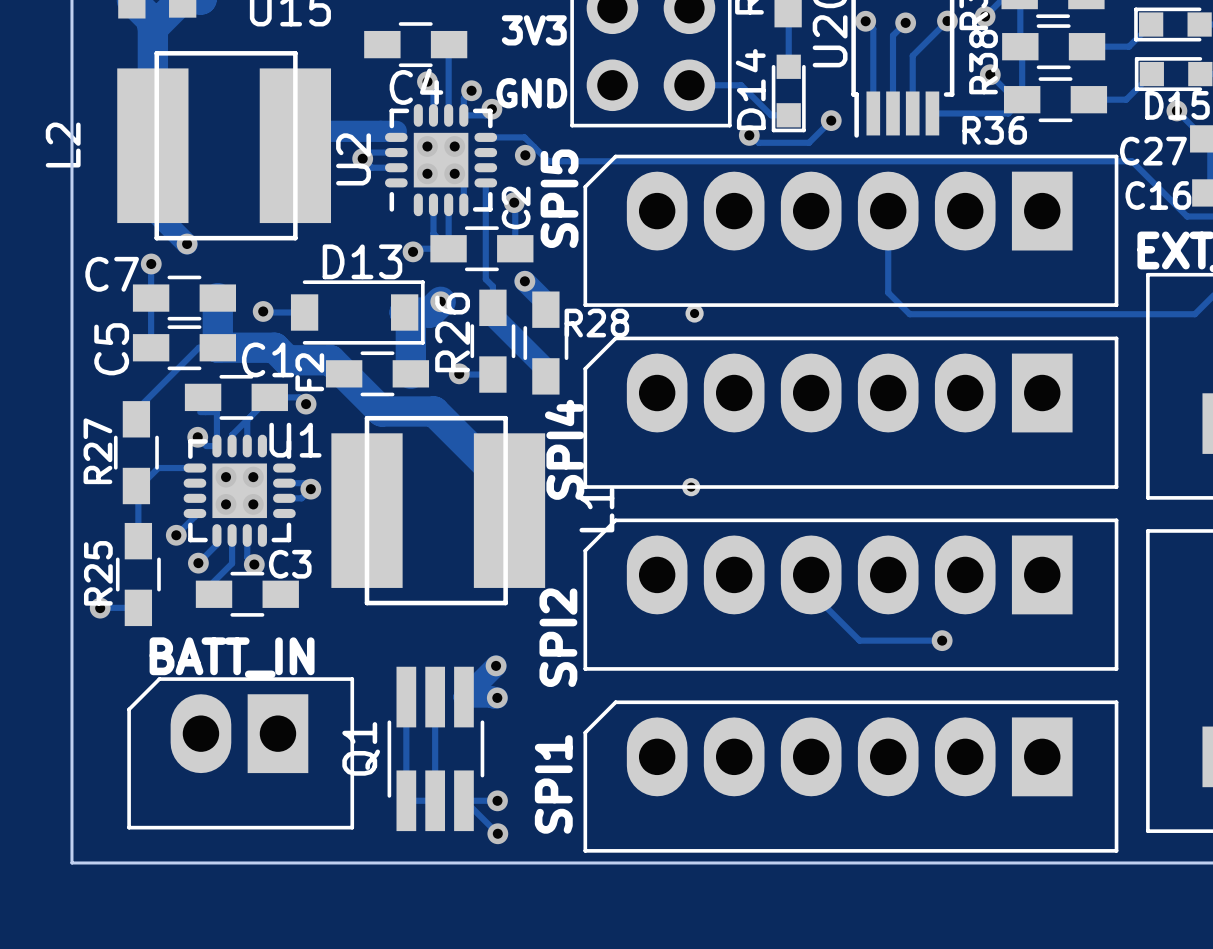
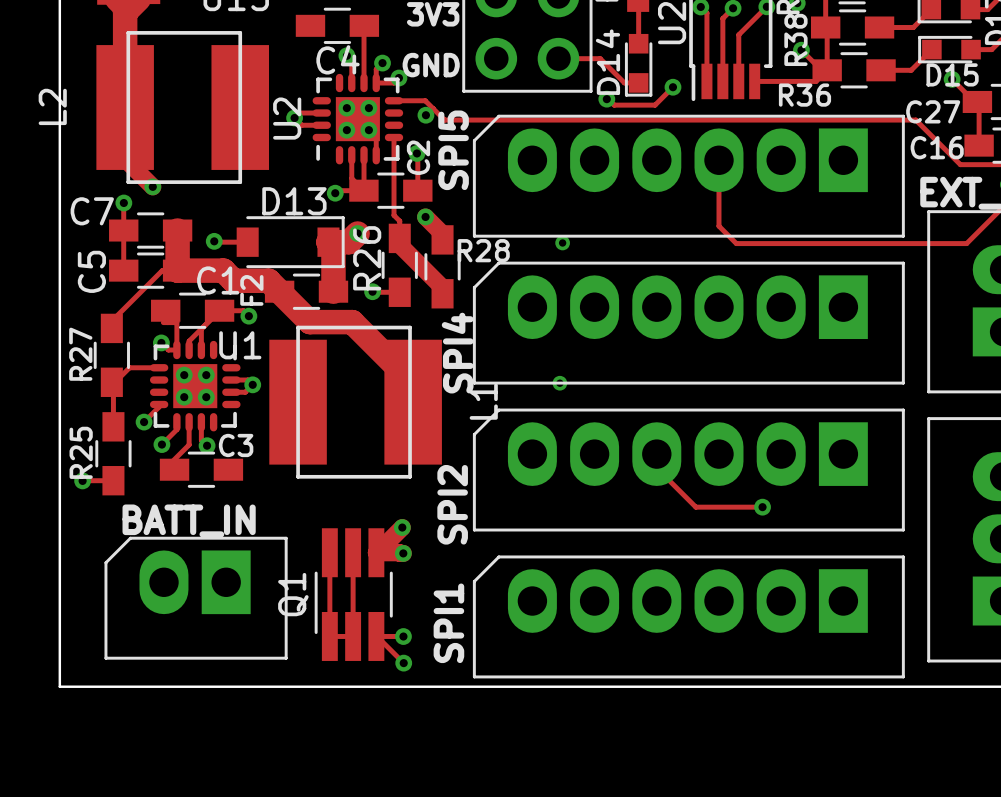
track: (396, 131) (309, 131) (303, 137) -> none

